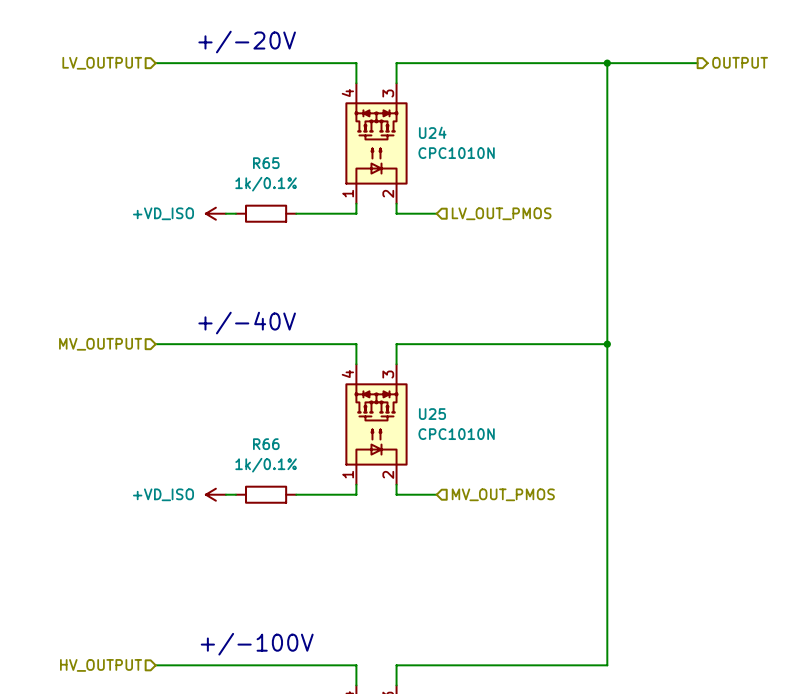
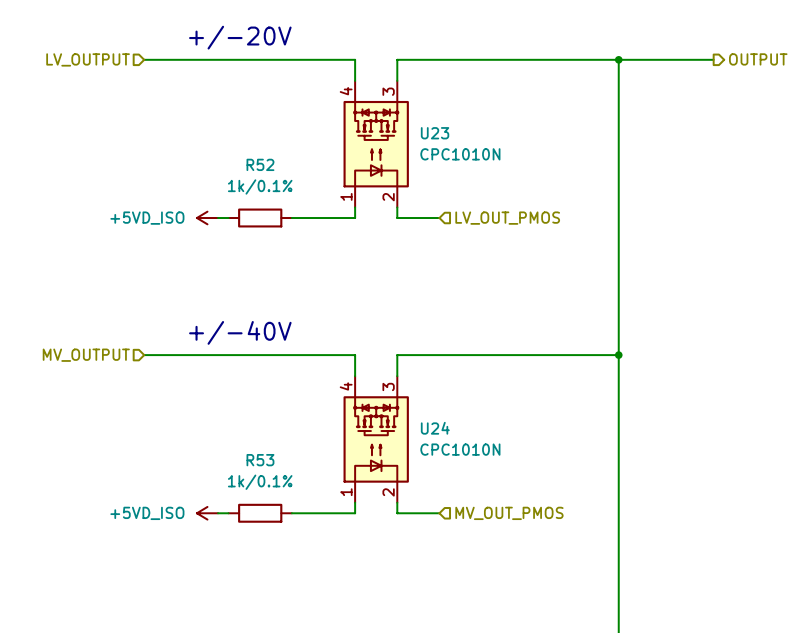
U24 name: U24 (432, 132) -> U23 (435, 133)
R65 name: R65 (266, 163) -> R52 (260, 164)
power symbol: +VD_ISO (215, 213) -> +5VD_ISO (207, 218)
U25 name: U25 (432, 414) -> U24 (435, 428)
R66 name: R66 (266, 444) -> R53 (260, 460)
power symbol: +VD_ISO (215, 494) -> +5VD_ISO (207, 513)

